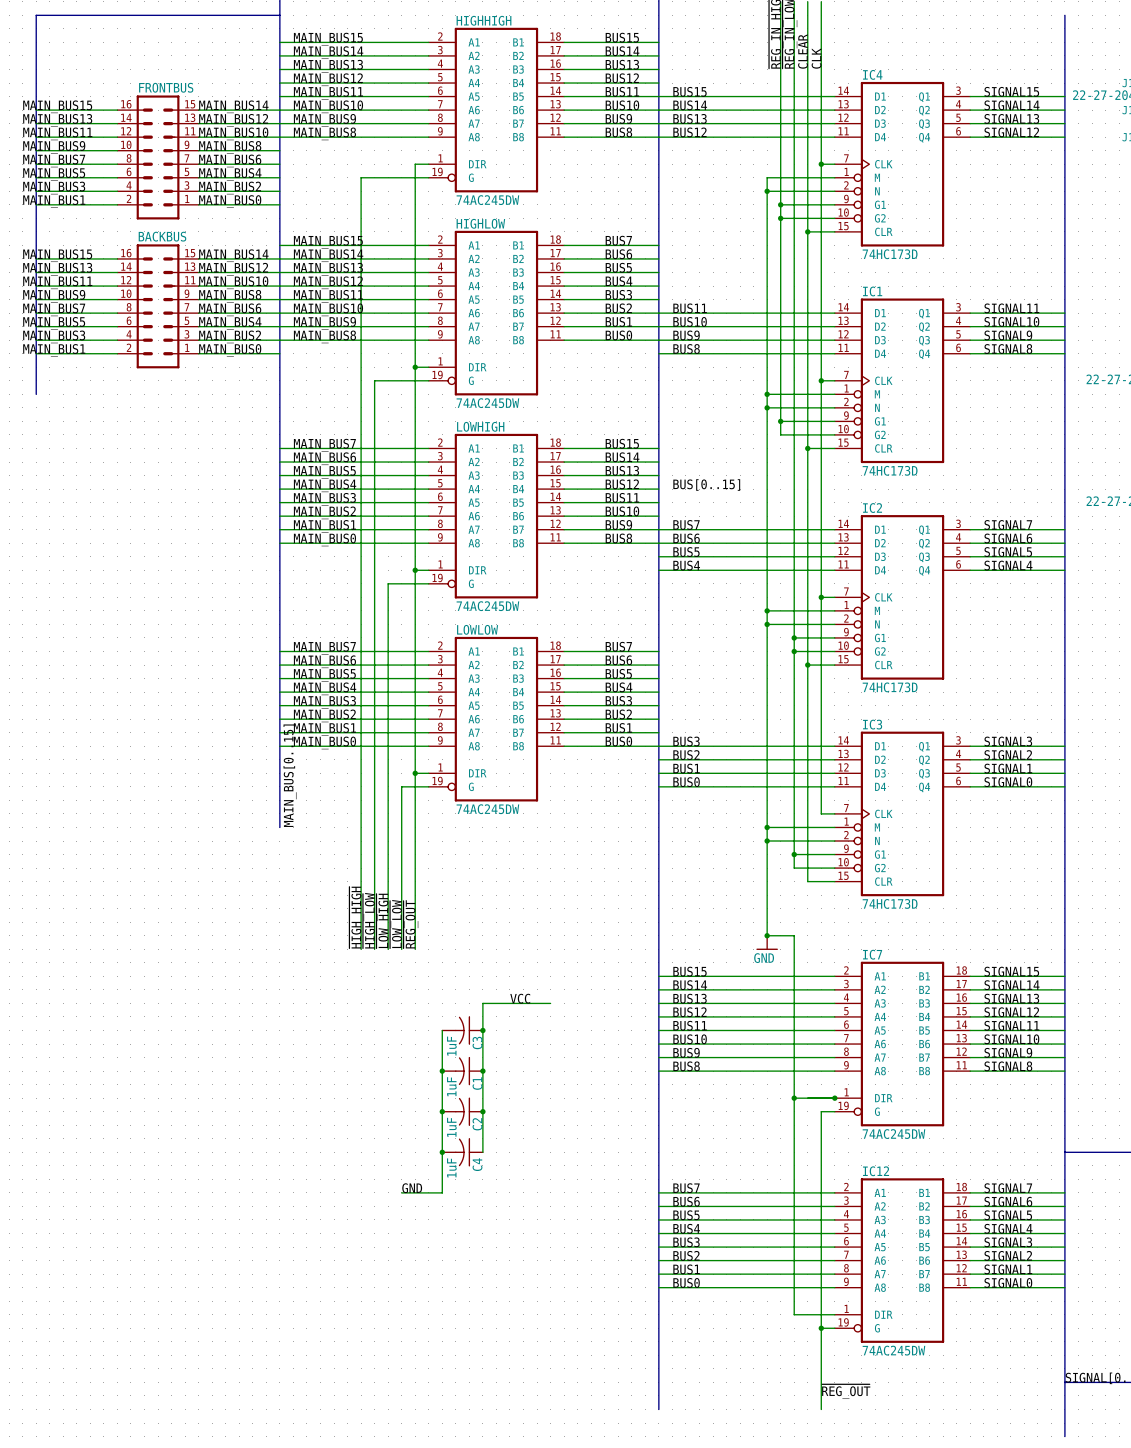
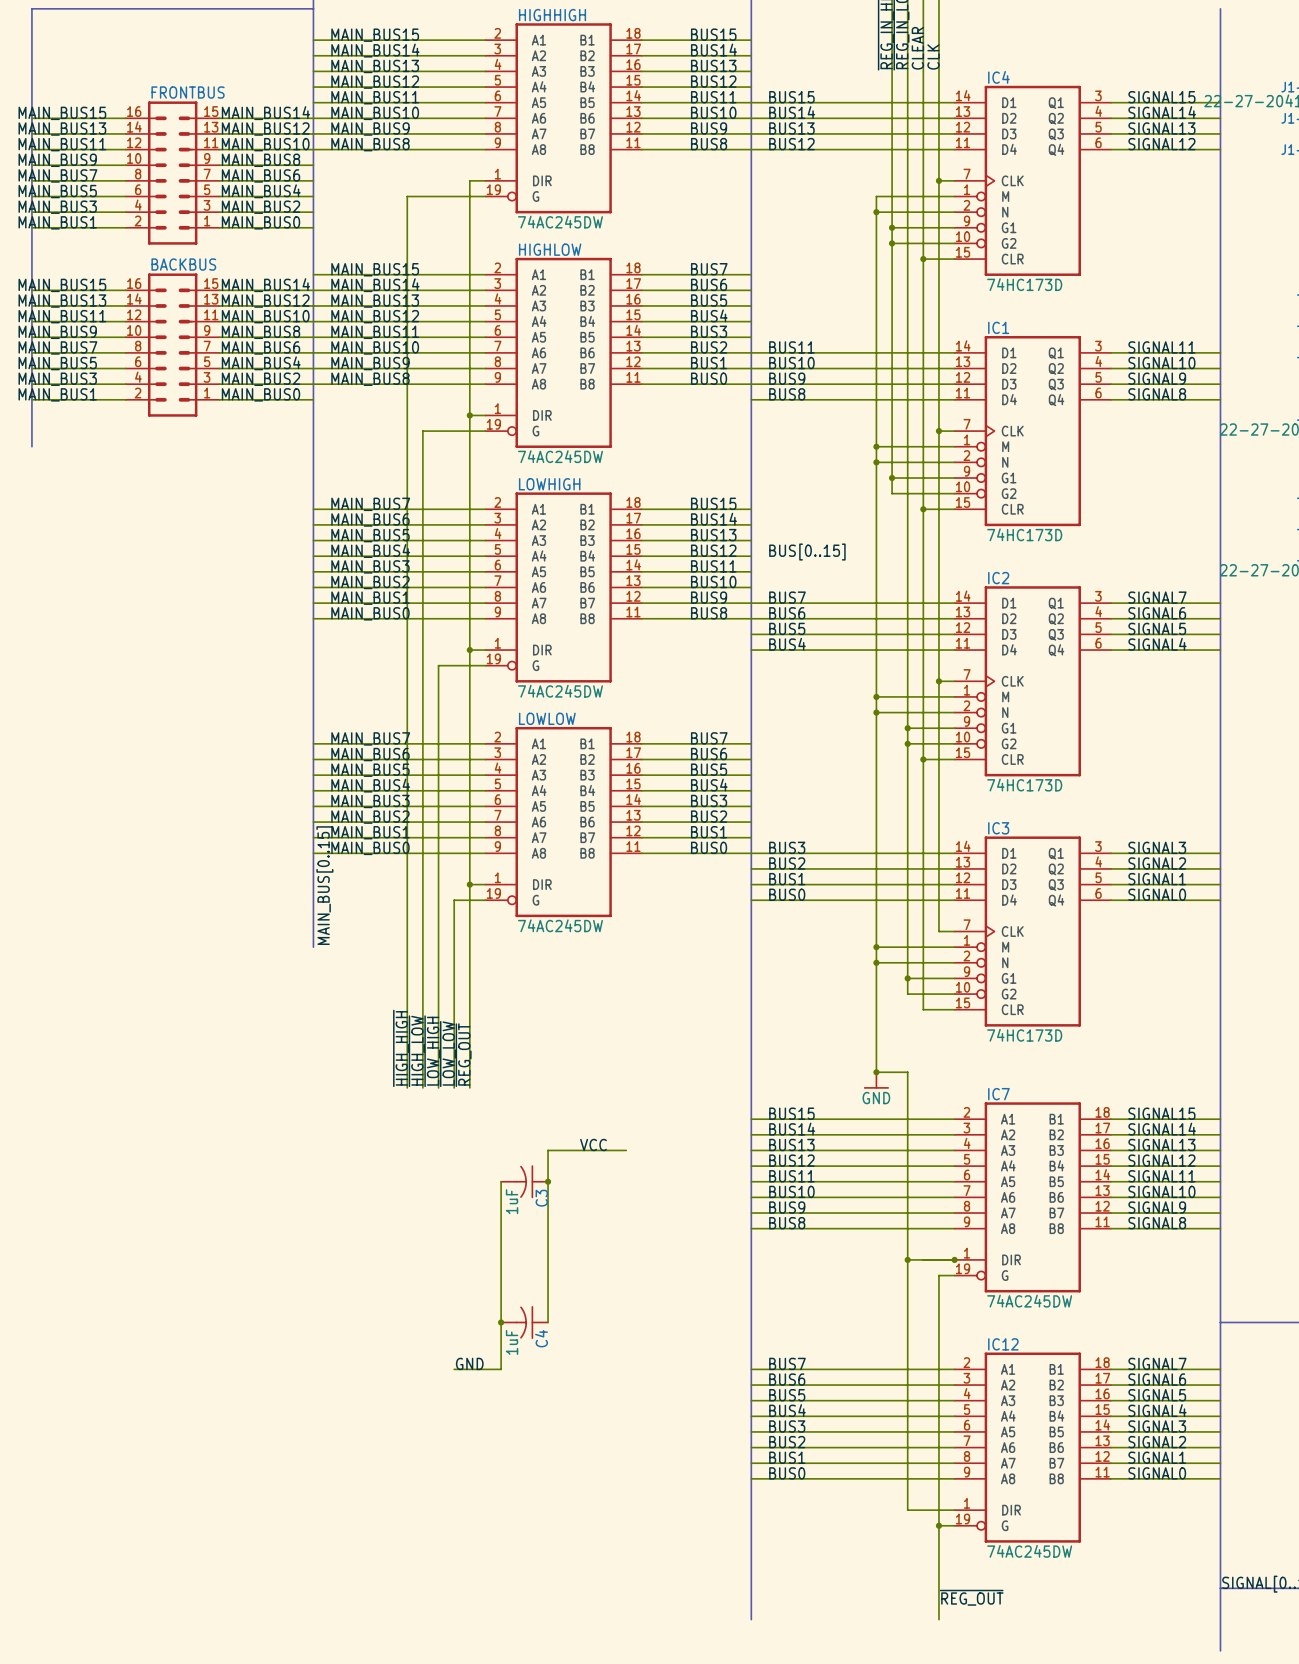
junction: (442, 1071) -> none
C1: 1uF (462, 1071) -> none
junction: (482, 1071) -> none
junction: (442, 1111) -> none
C2: 1uF (462, 1111) -> none
junction: (482, 1111) -> none

